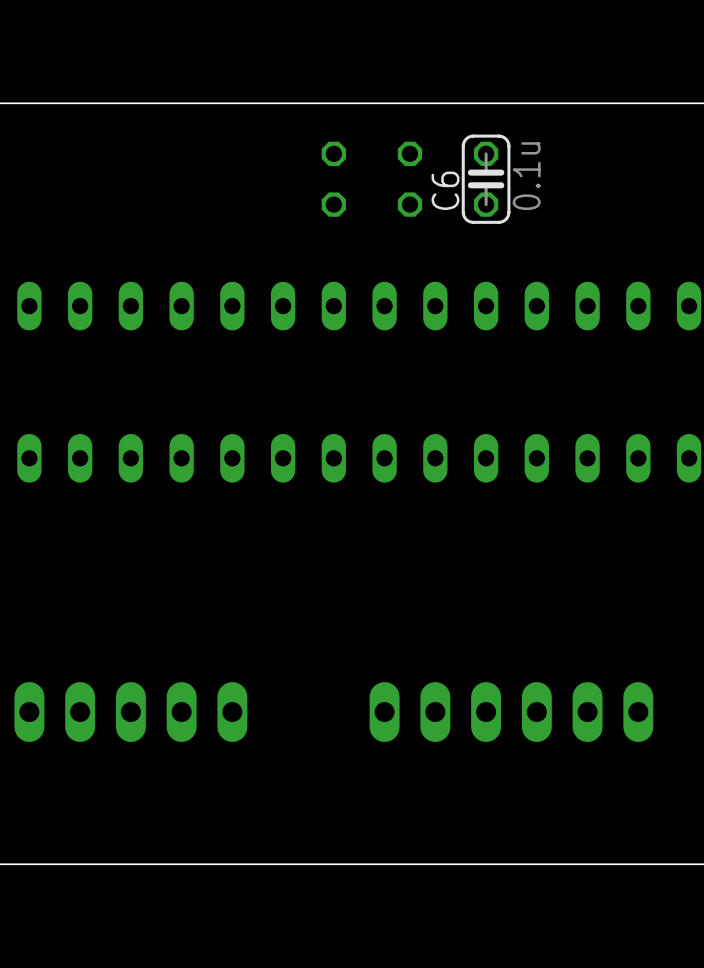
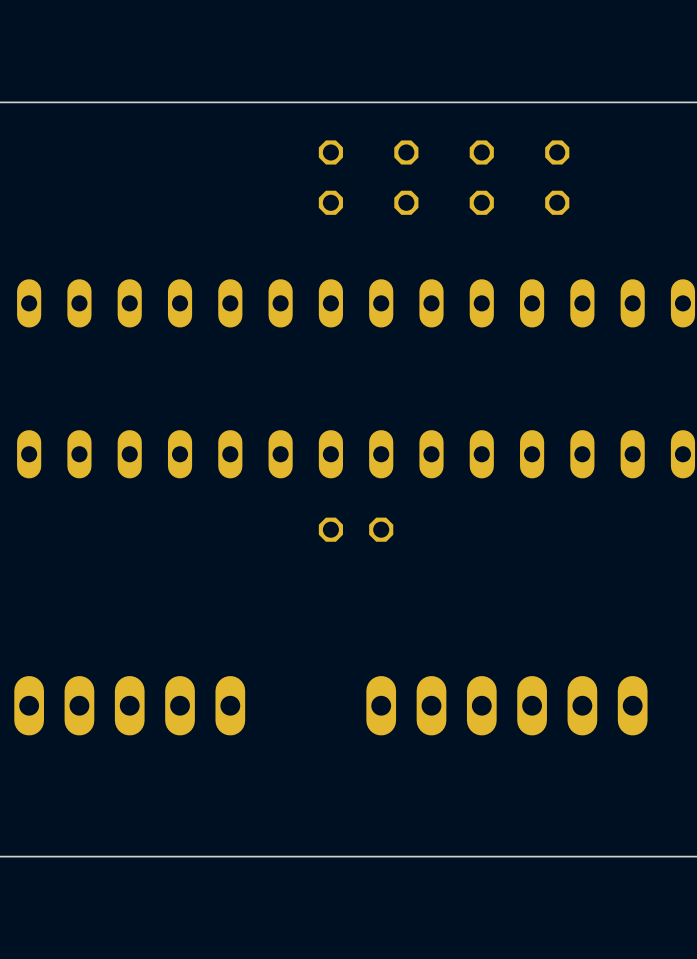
C6 side: bottom (486, 179) -> top (481, 177)
part: none -> (557, 177)
part: none -> (356, 529)

